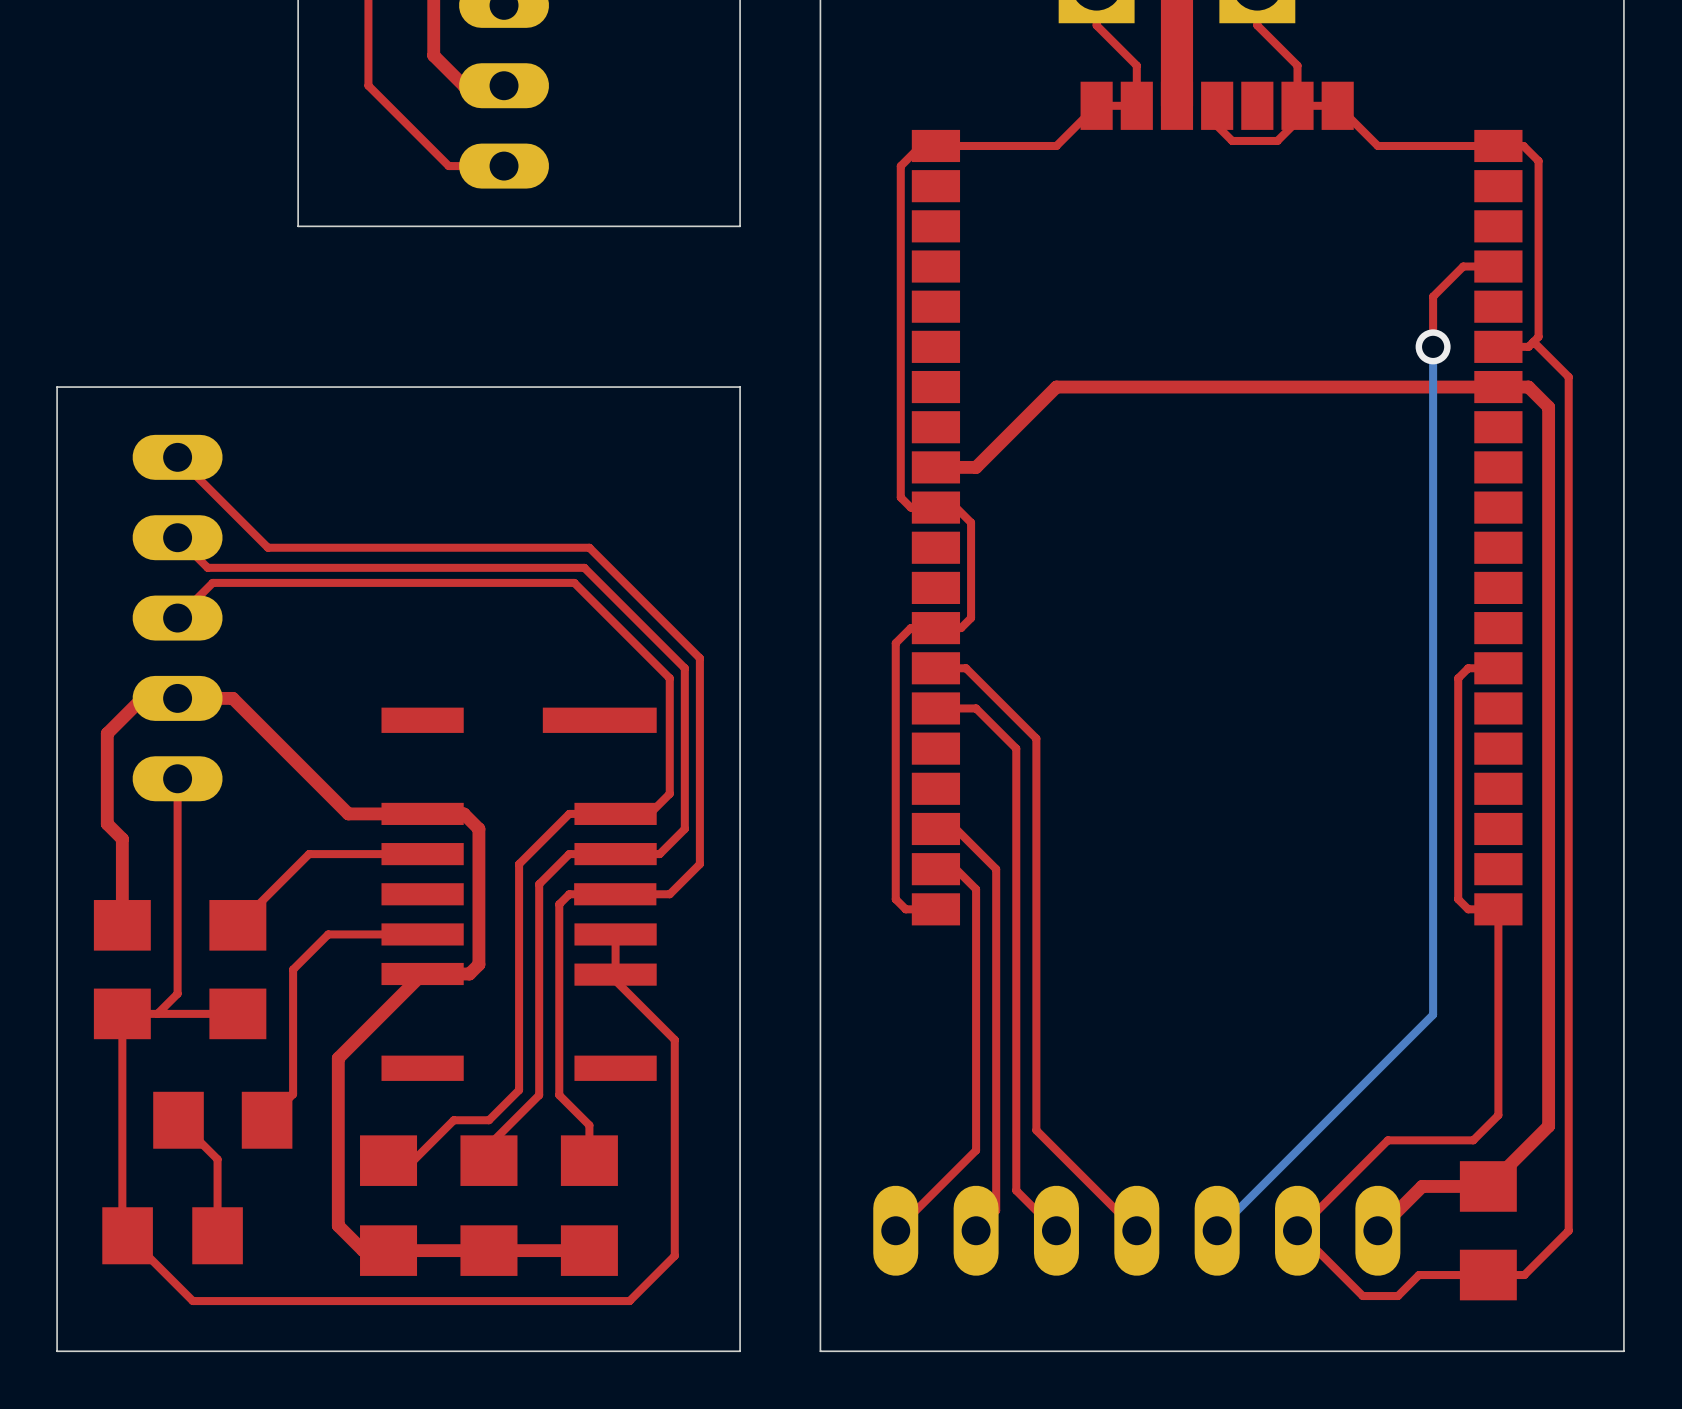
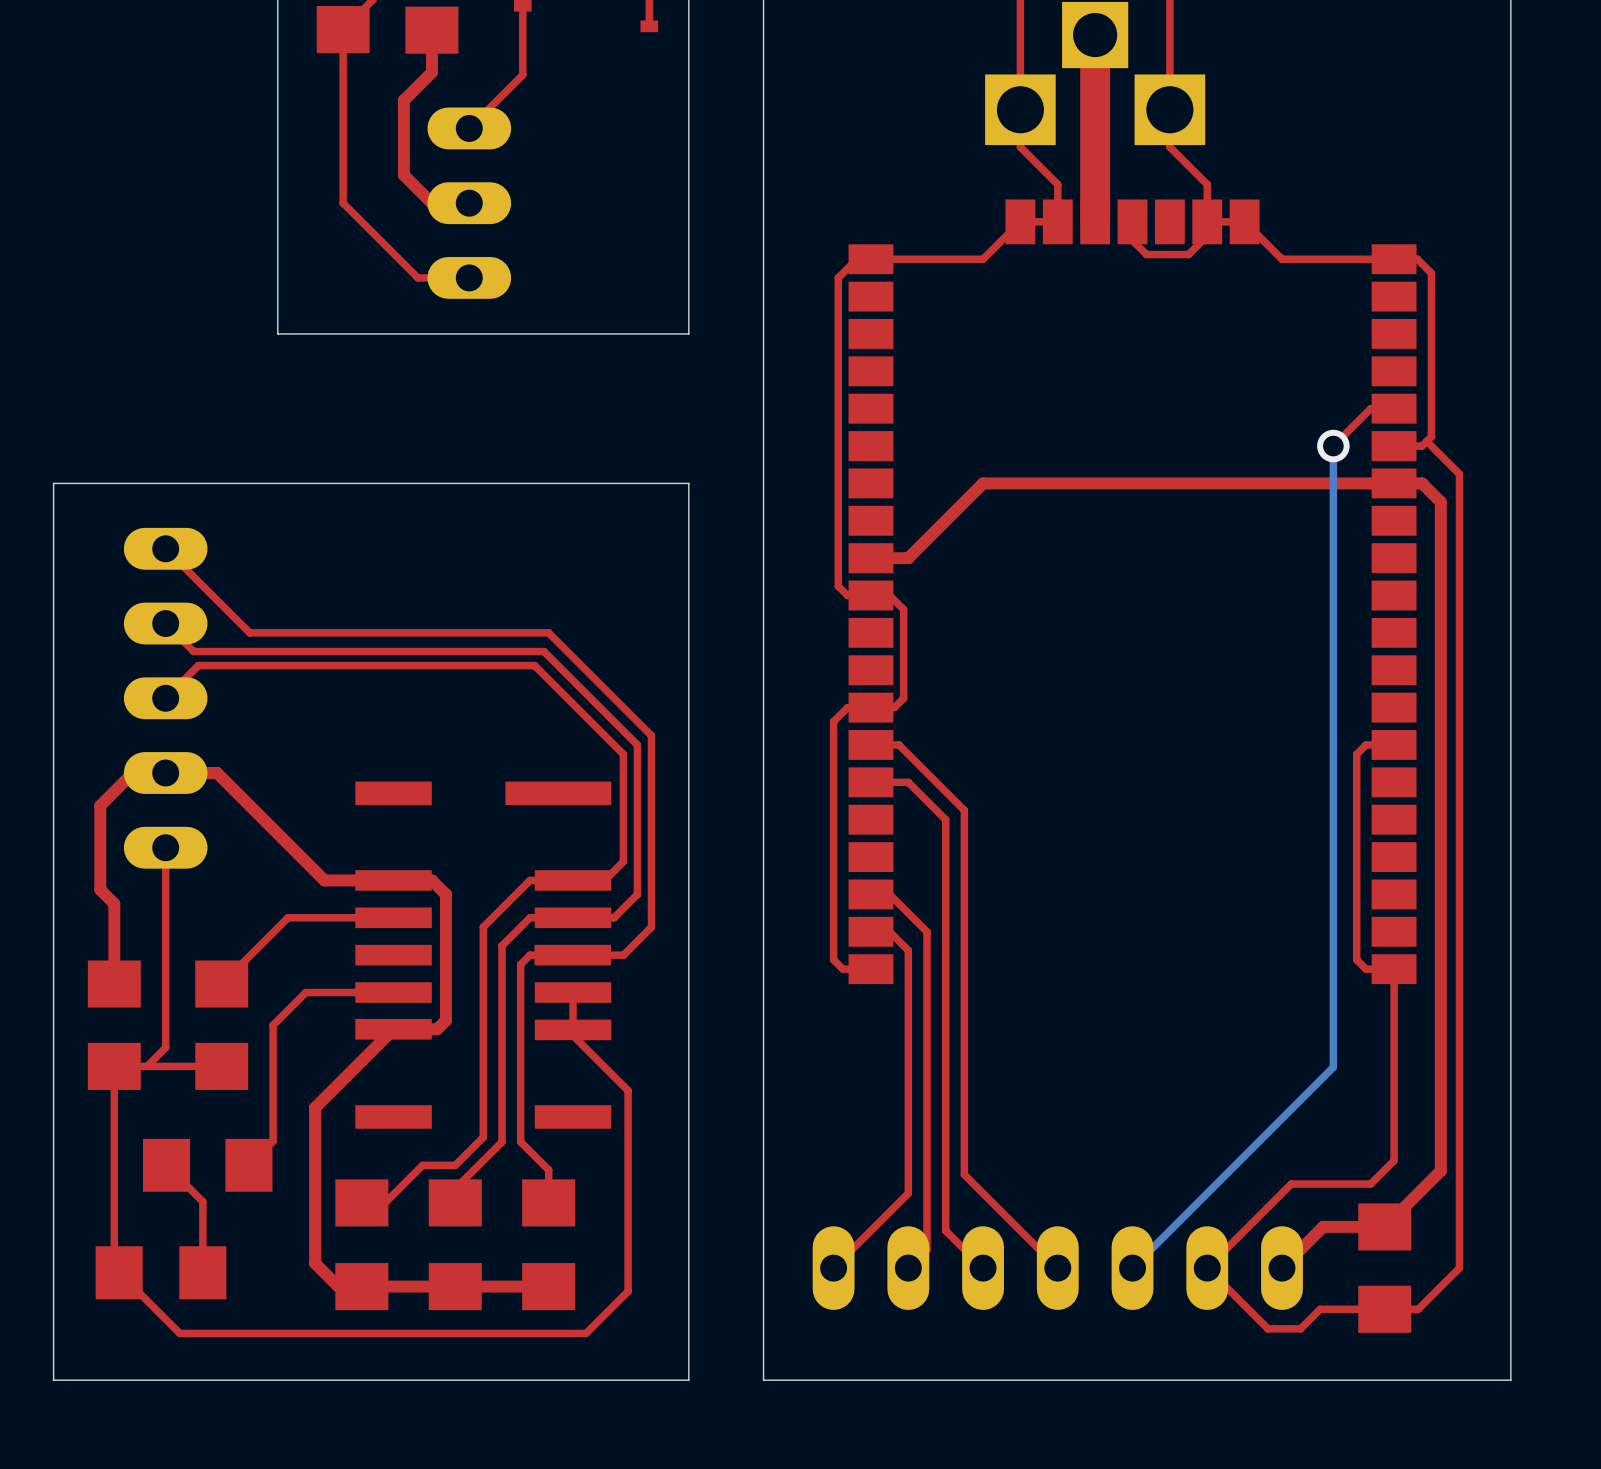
top track: (1498, 266) (1463, 266) (1433, 296) (1433, 346) -> (1394, 408) (1370, 408) (1333, 446)

